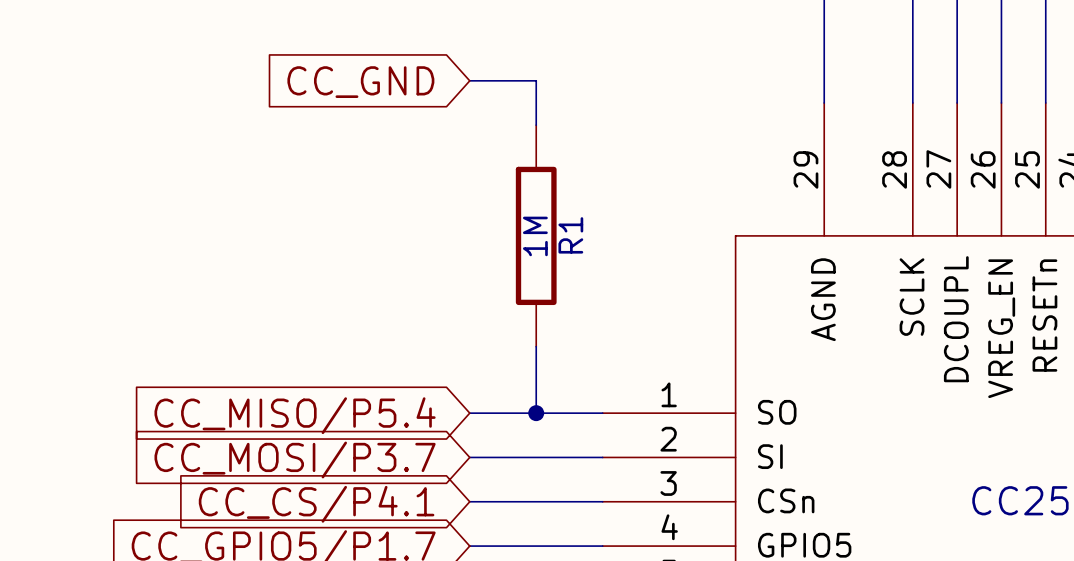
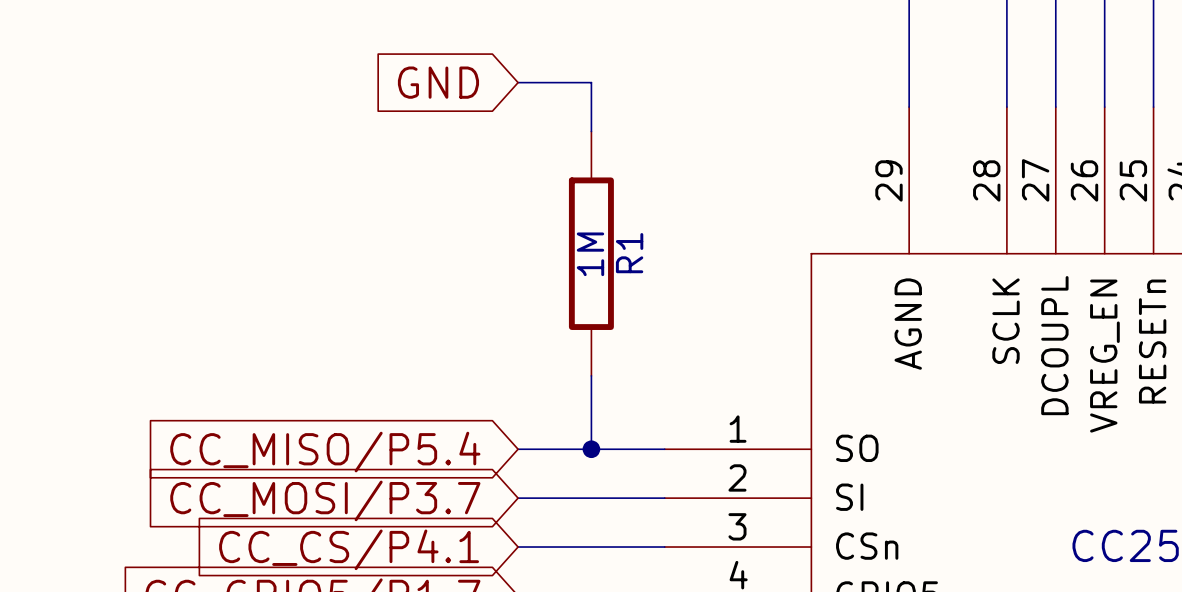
global label: CC_GND (360, 82) -> GND (438, 82)

